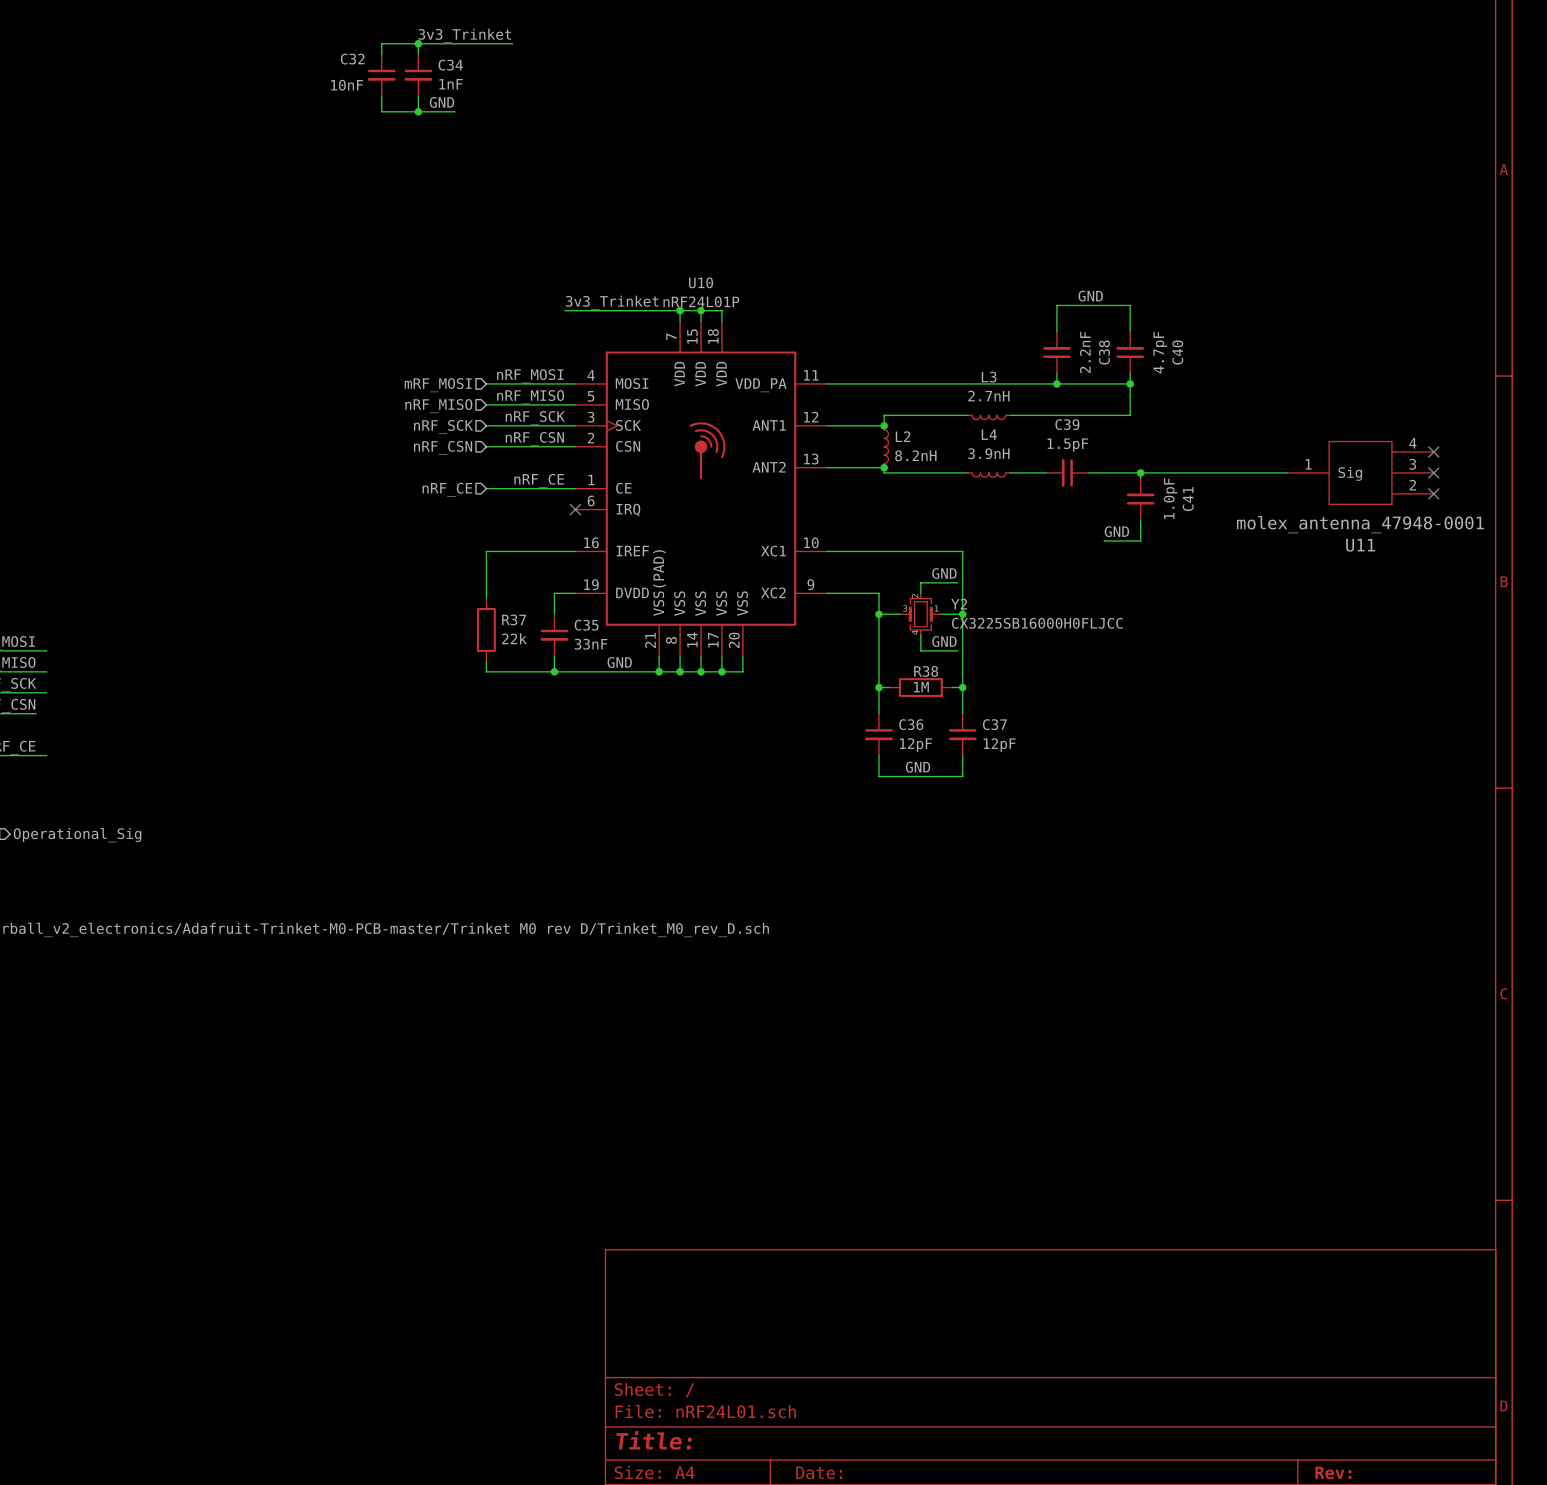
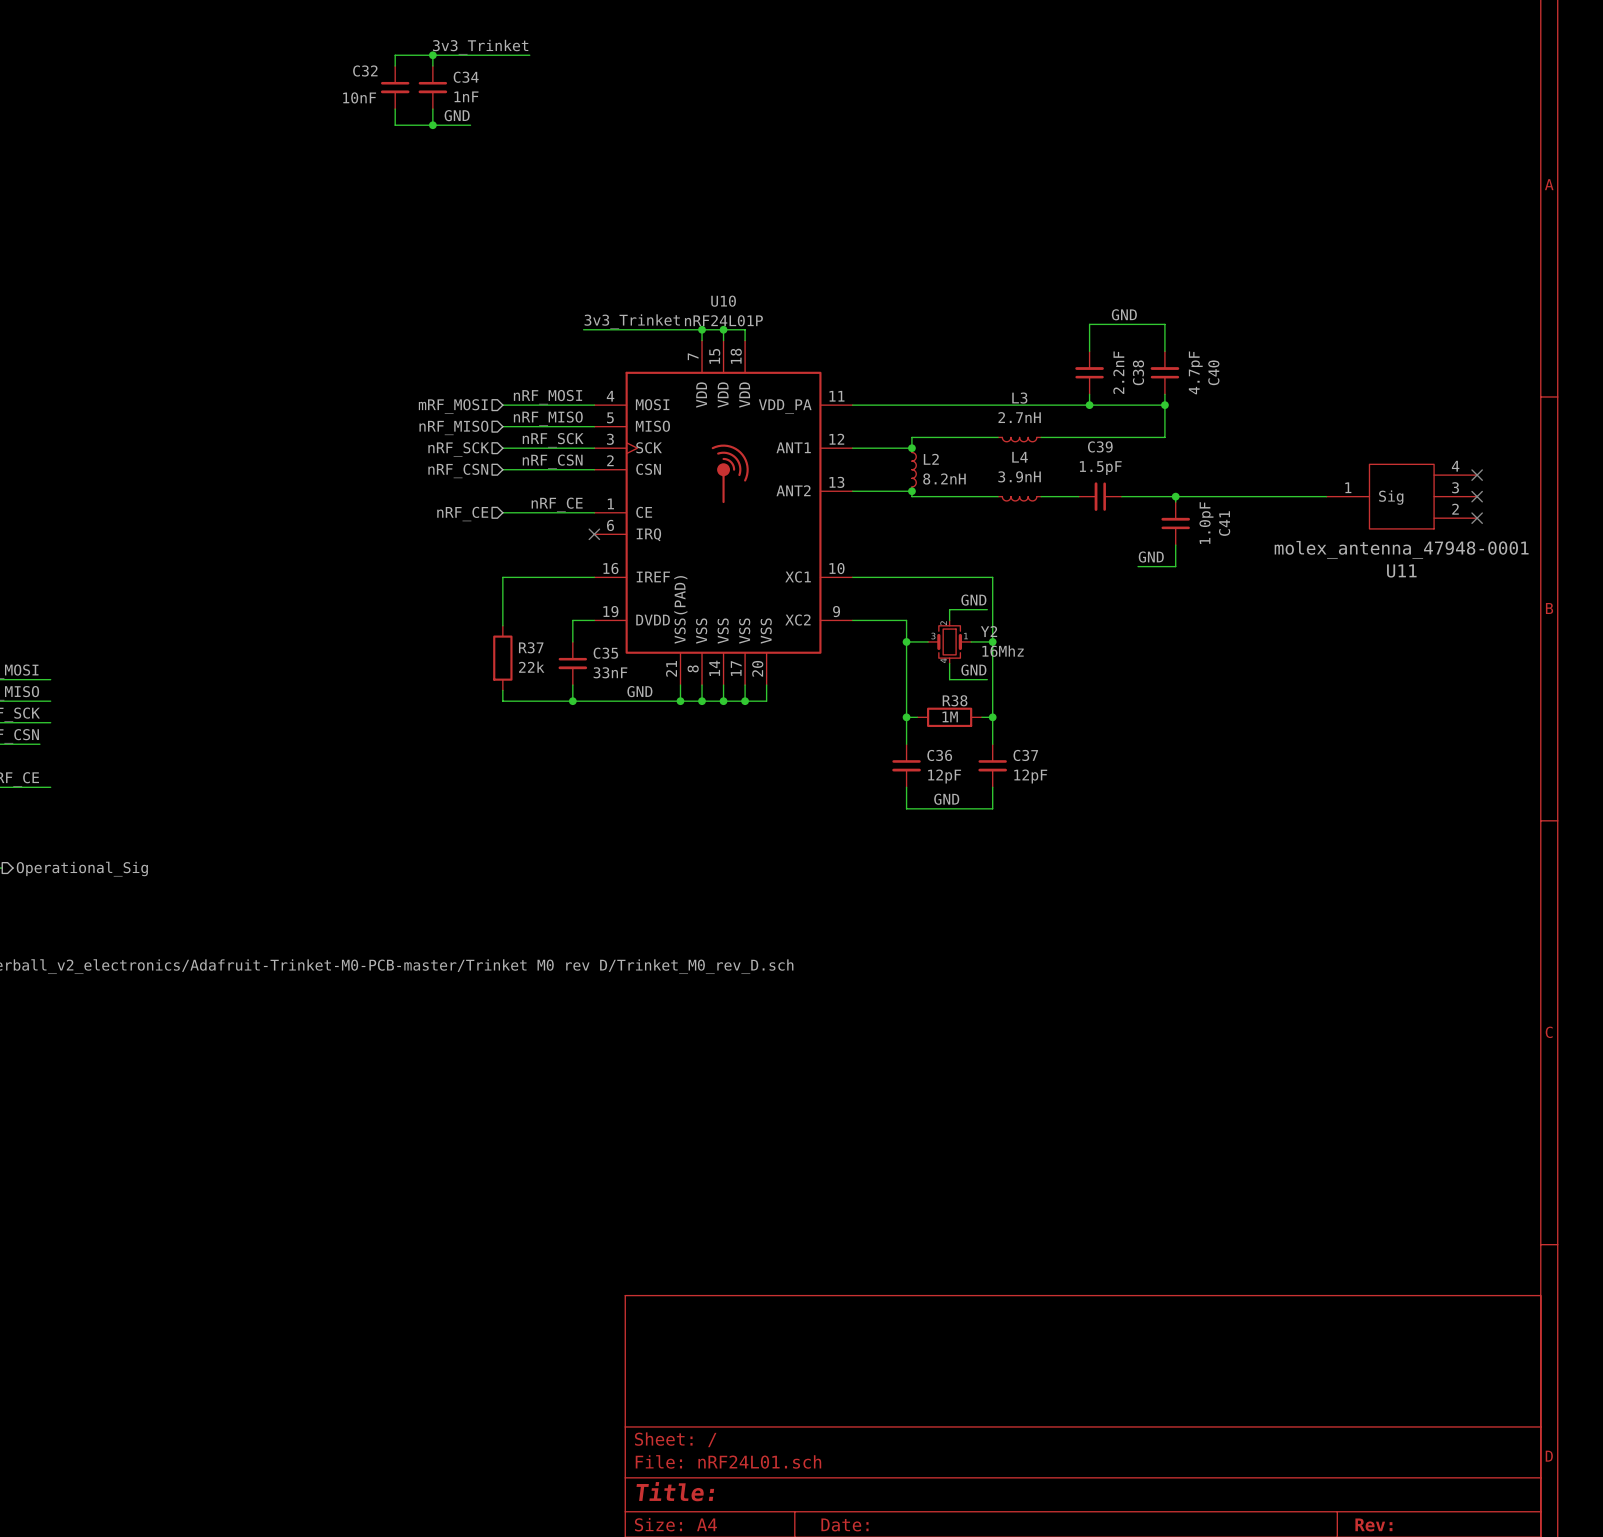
Y2 value: CX3225SB16000H0FLJCC (1037, 623) -> 16Mhz (1003, 651)

